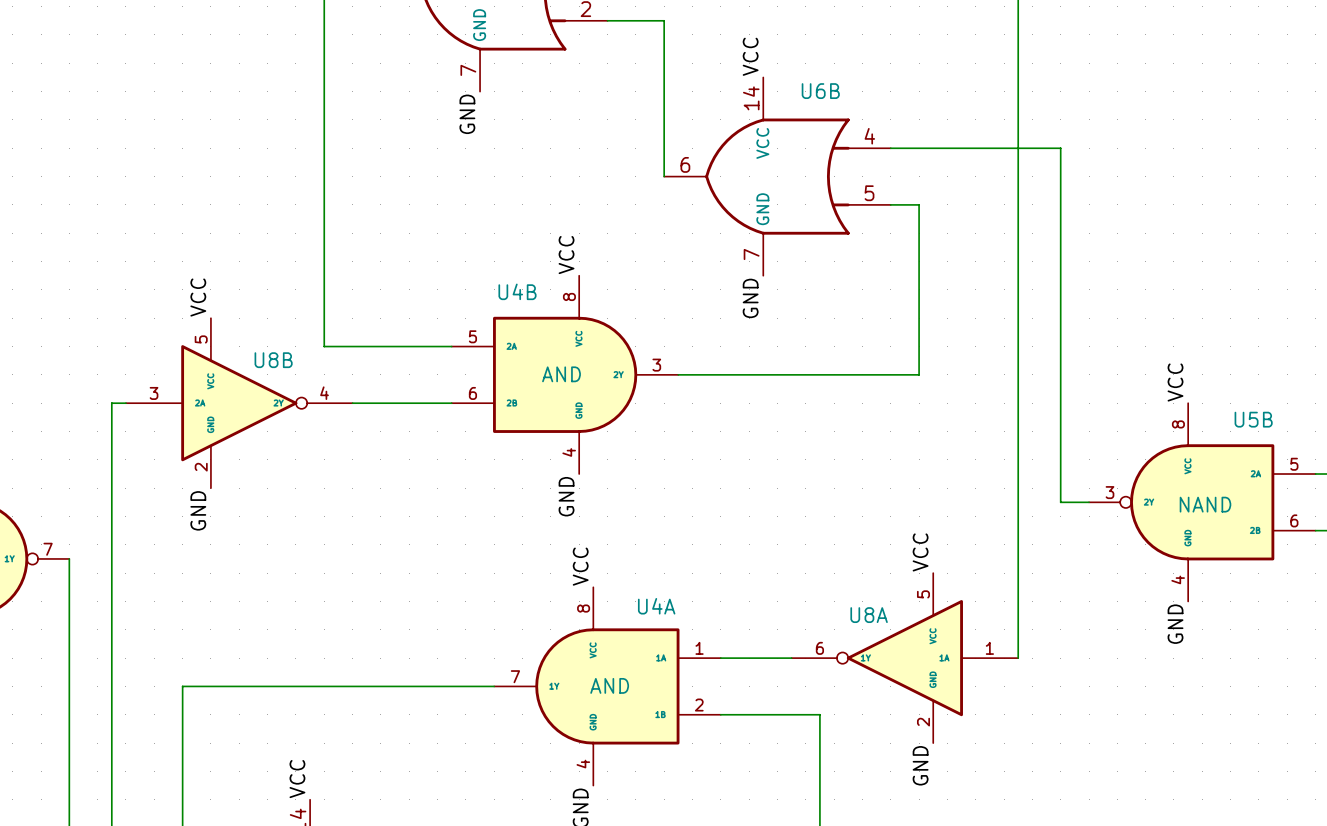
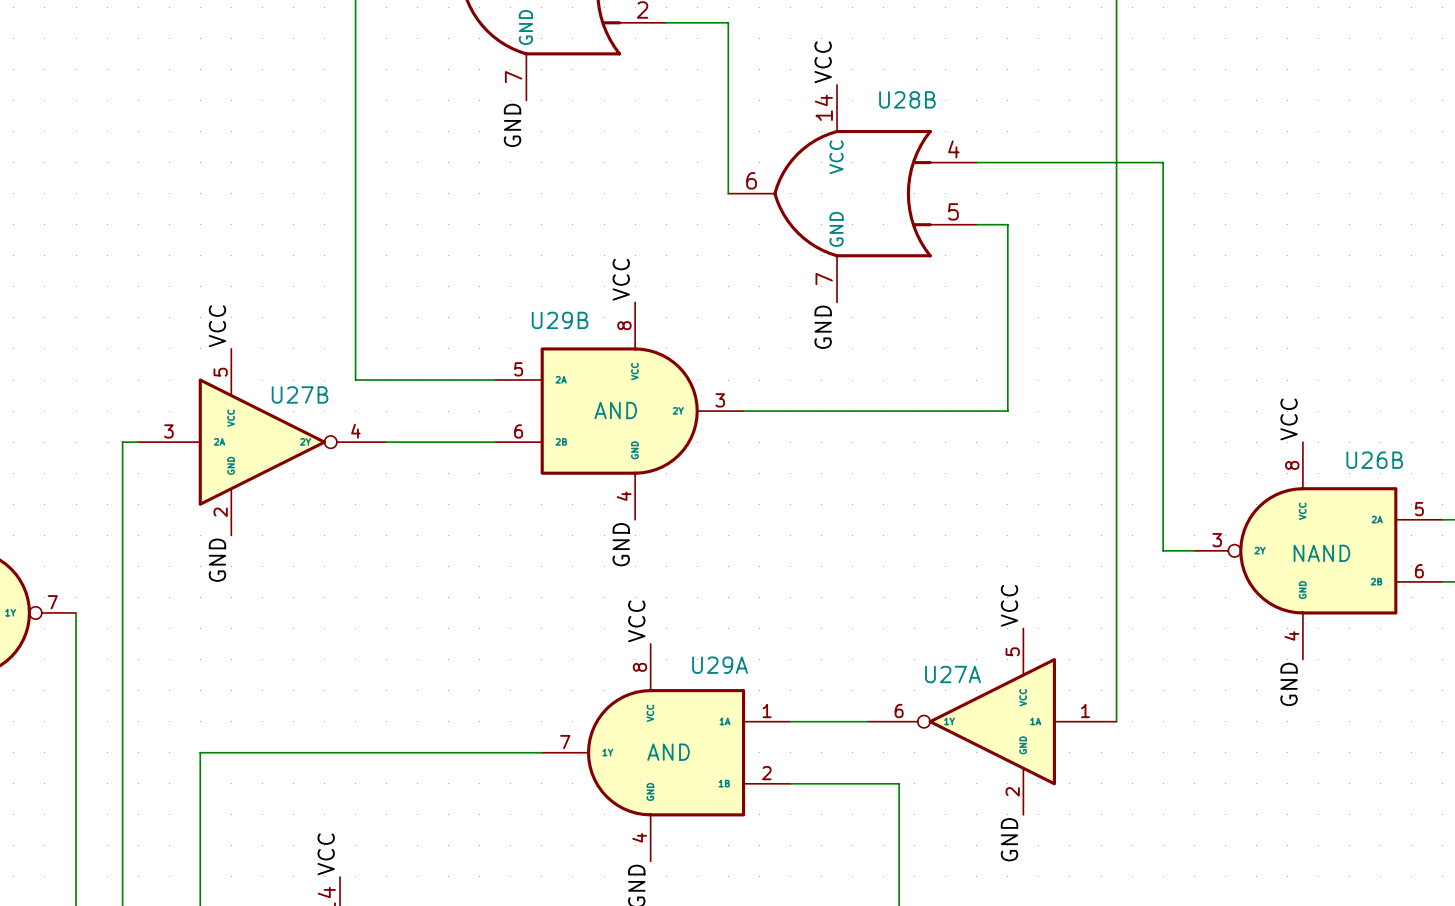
U6B name: U6B (820, 91) -> U28B (907, 99)
U4B name: U4B (517, 291) -> U29B (560, 320)
U8B name: U8B (273, 360) -> U27B (300, 394)
U5B name: U5B (1253, 419) -> U26B (1374, 460)
U4A name: U4A (656, 606) -> U29A (720, 665)
U8A name: U8A (869, 615) -> U27A (953, 674)

